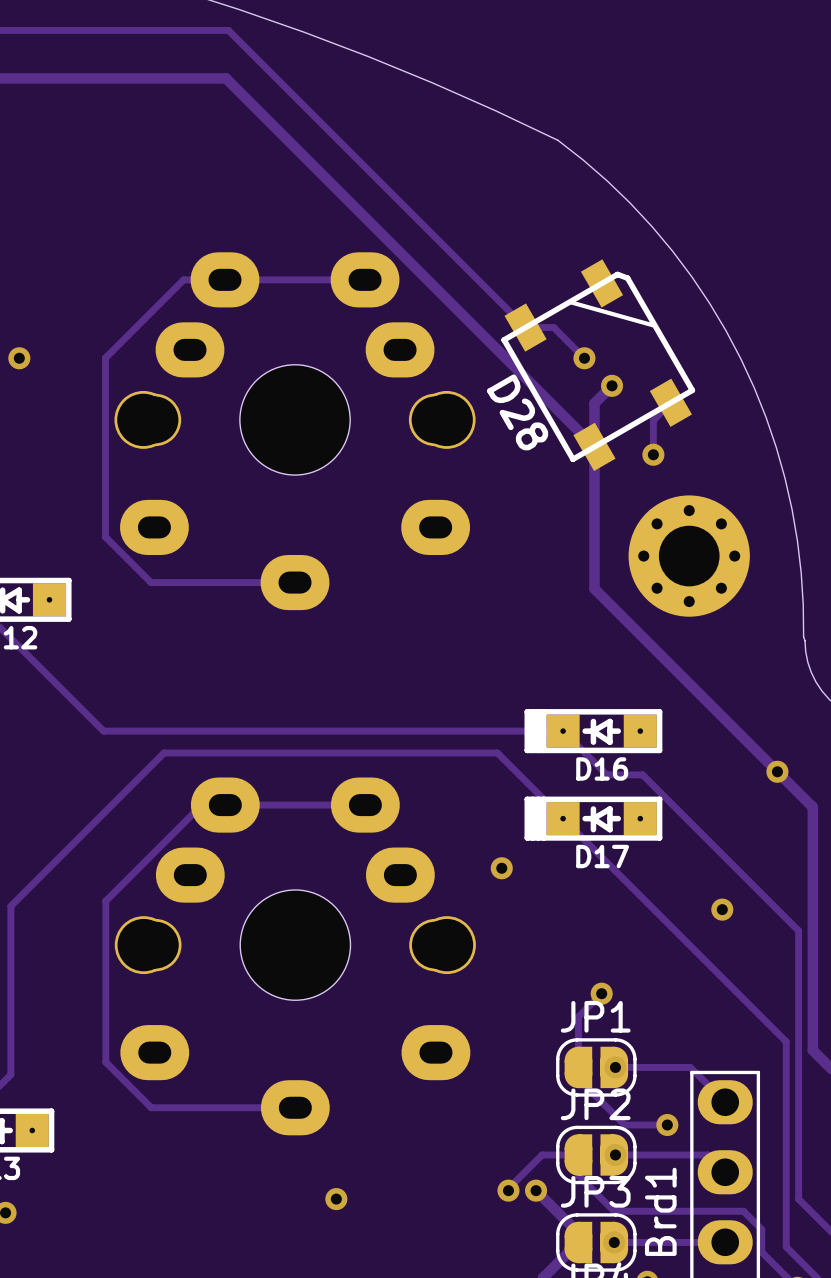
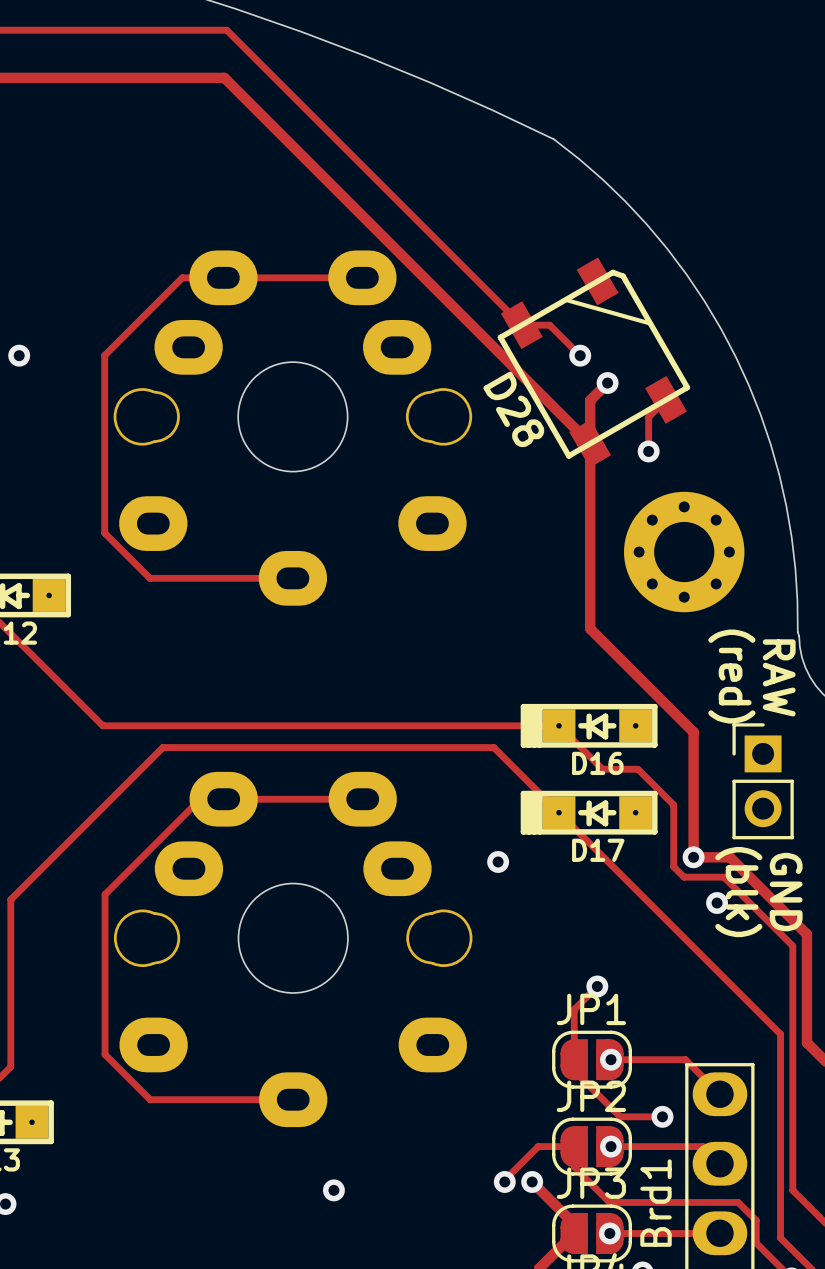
track: (594, 588) (812, 807) (812, 941) -> (590, 584) (590, 628) (693, 732) (693, 857) (729, 857) (806, 934)
text: none -> (red) (731, 676)
text: none -> RAW (779, 677)
via position: (777, 771) -> (693, 857)
part: none -> (763, 781)
track: (678, 810) (798, 930) (798, 952) -> (673, 804) (673, 866) (684, 877) (723, 877) (792, 946)
text: none -> (blk) (738, 892)
text: none -> GND (786, 892)

